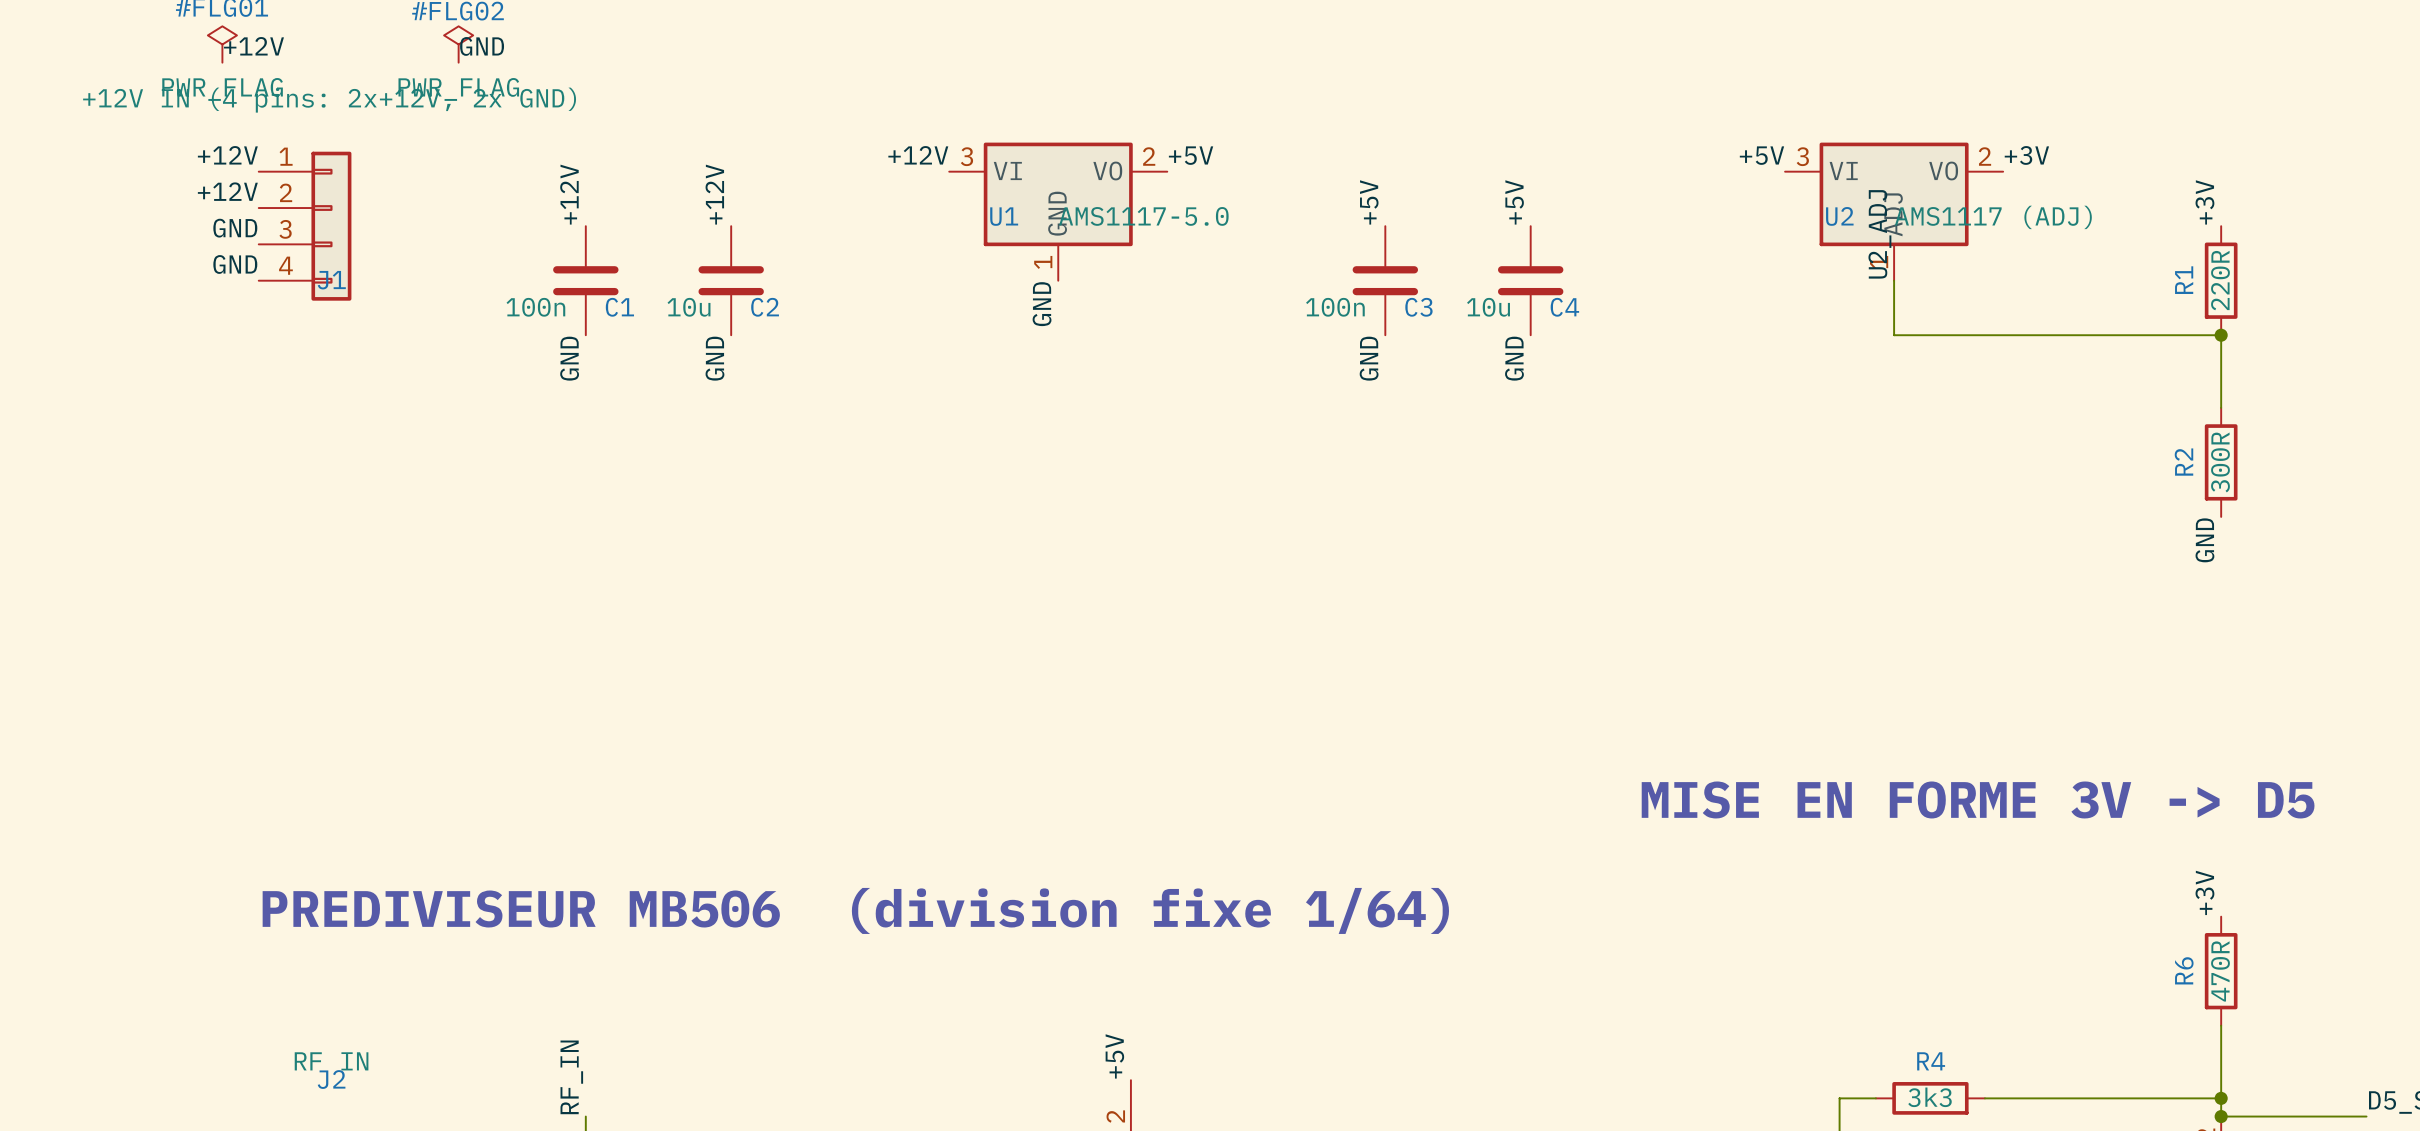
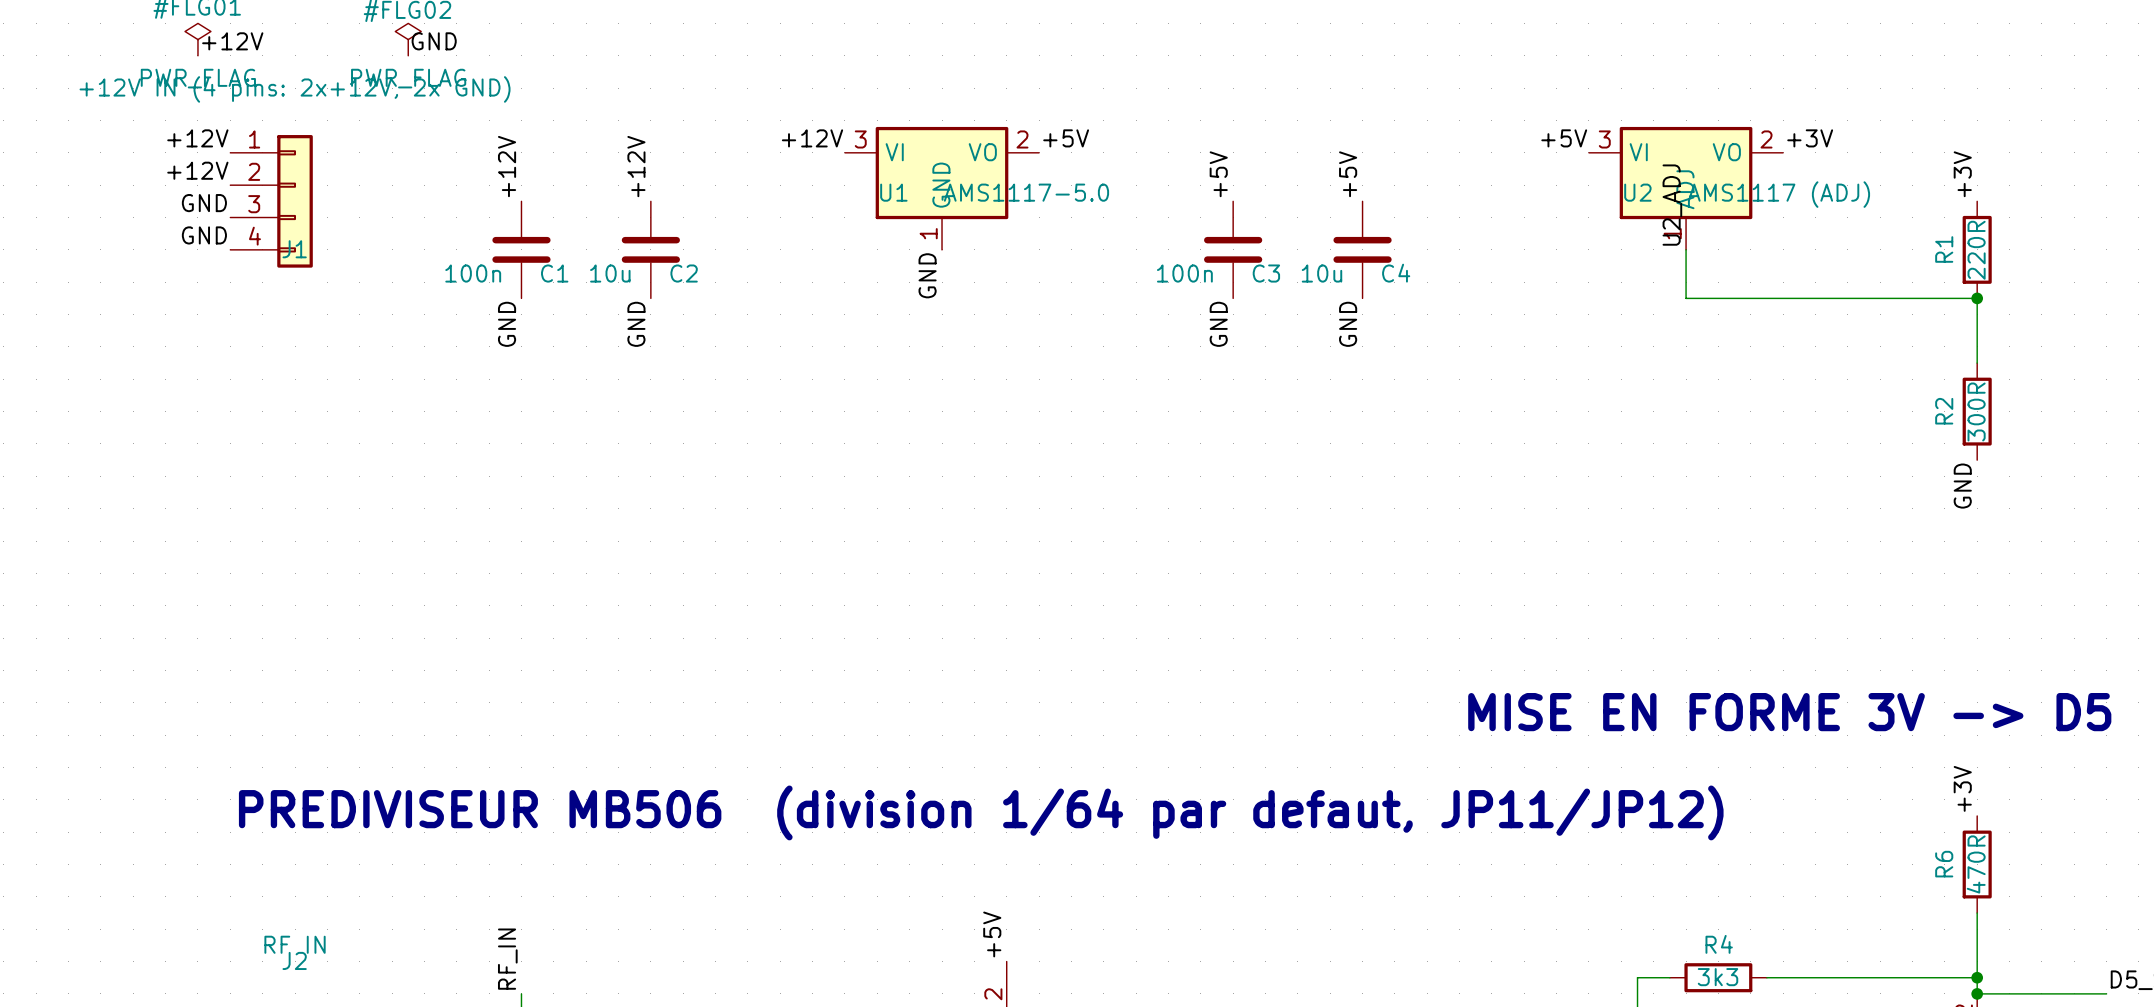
text: PREDIVISEUR MB506 (division fixe 1/64) (855, 910) -> PREDIVISEUR MB506 (division 1/64 par defaut, JP11/JP12) (981, 812)

